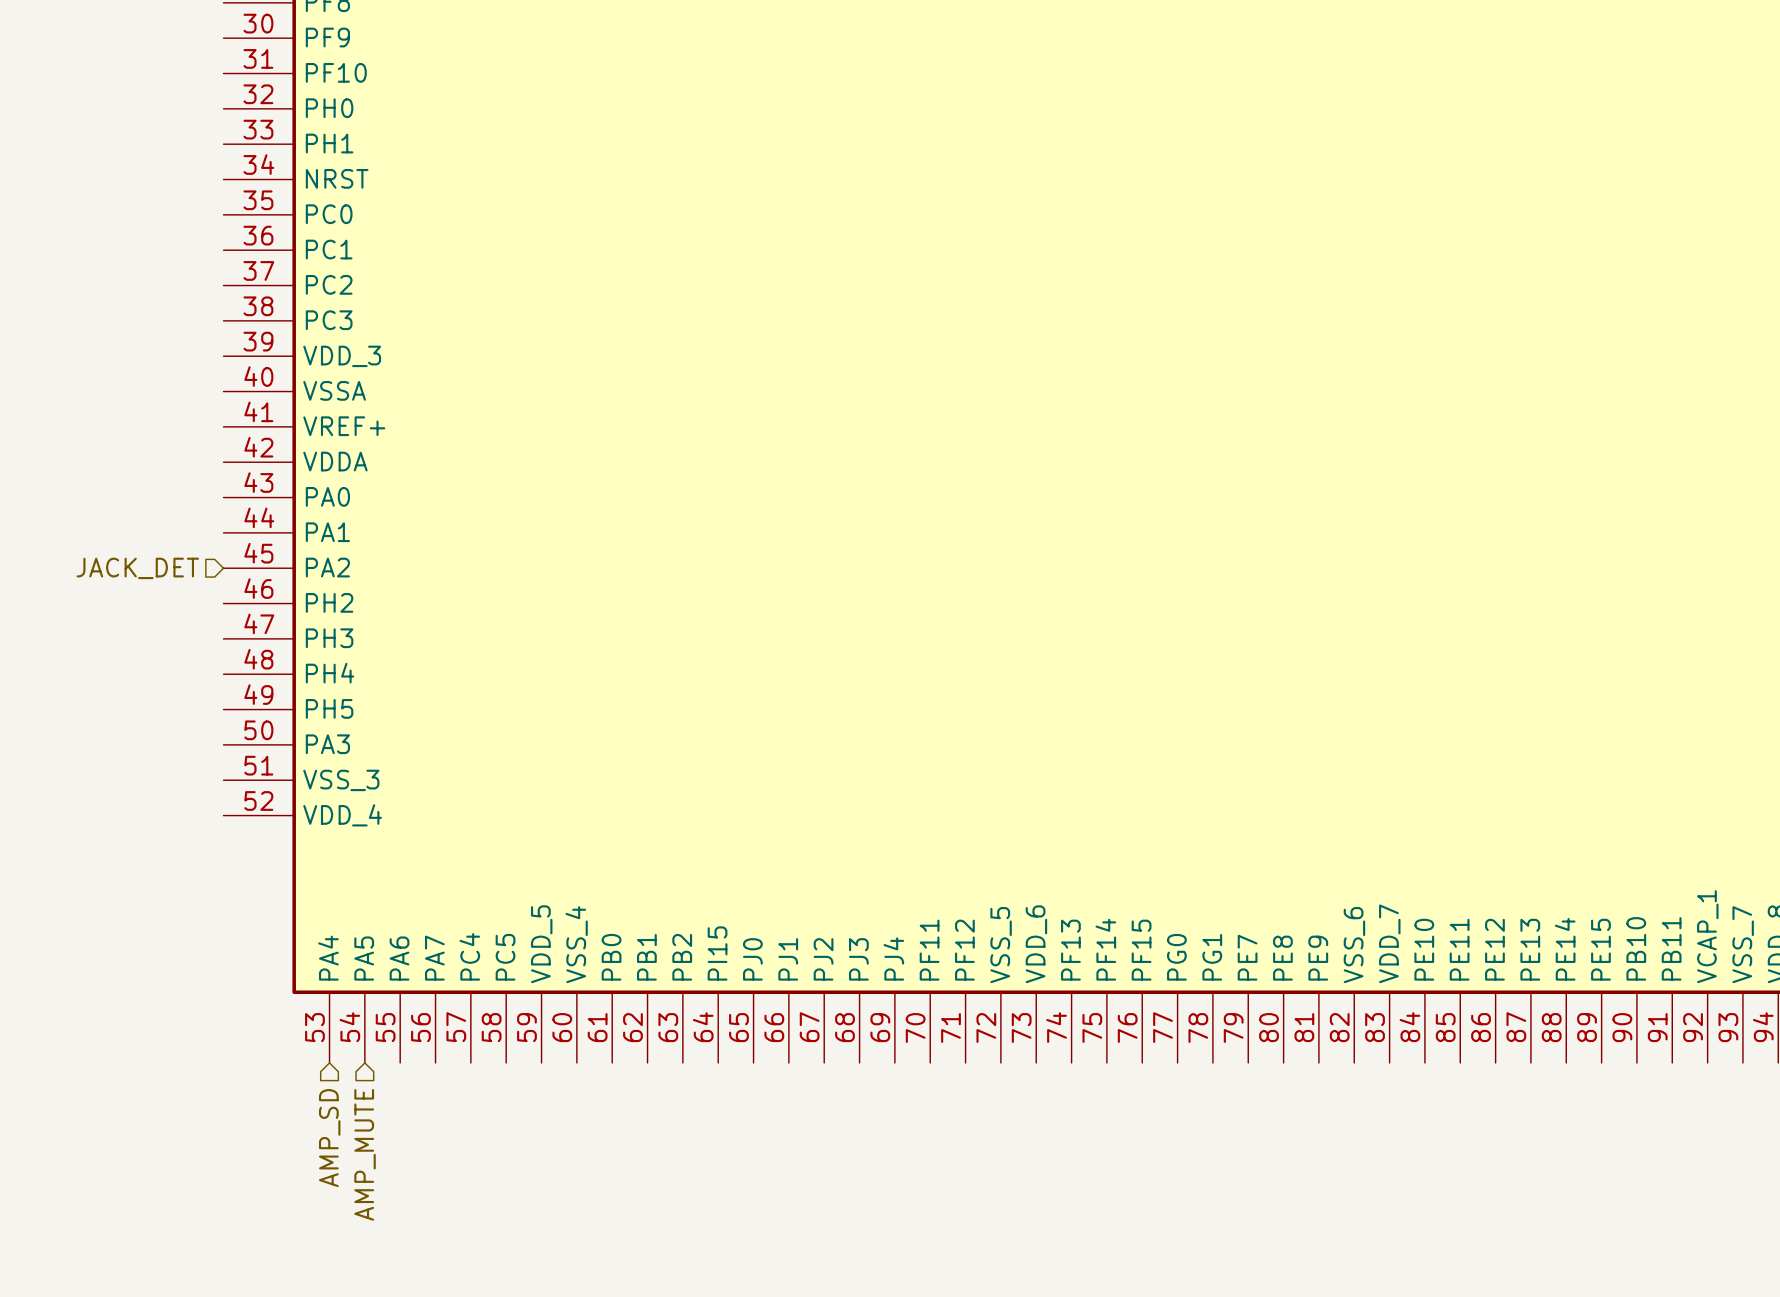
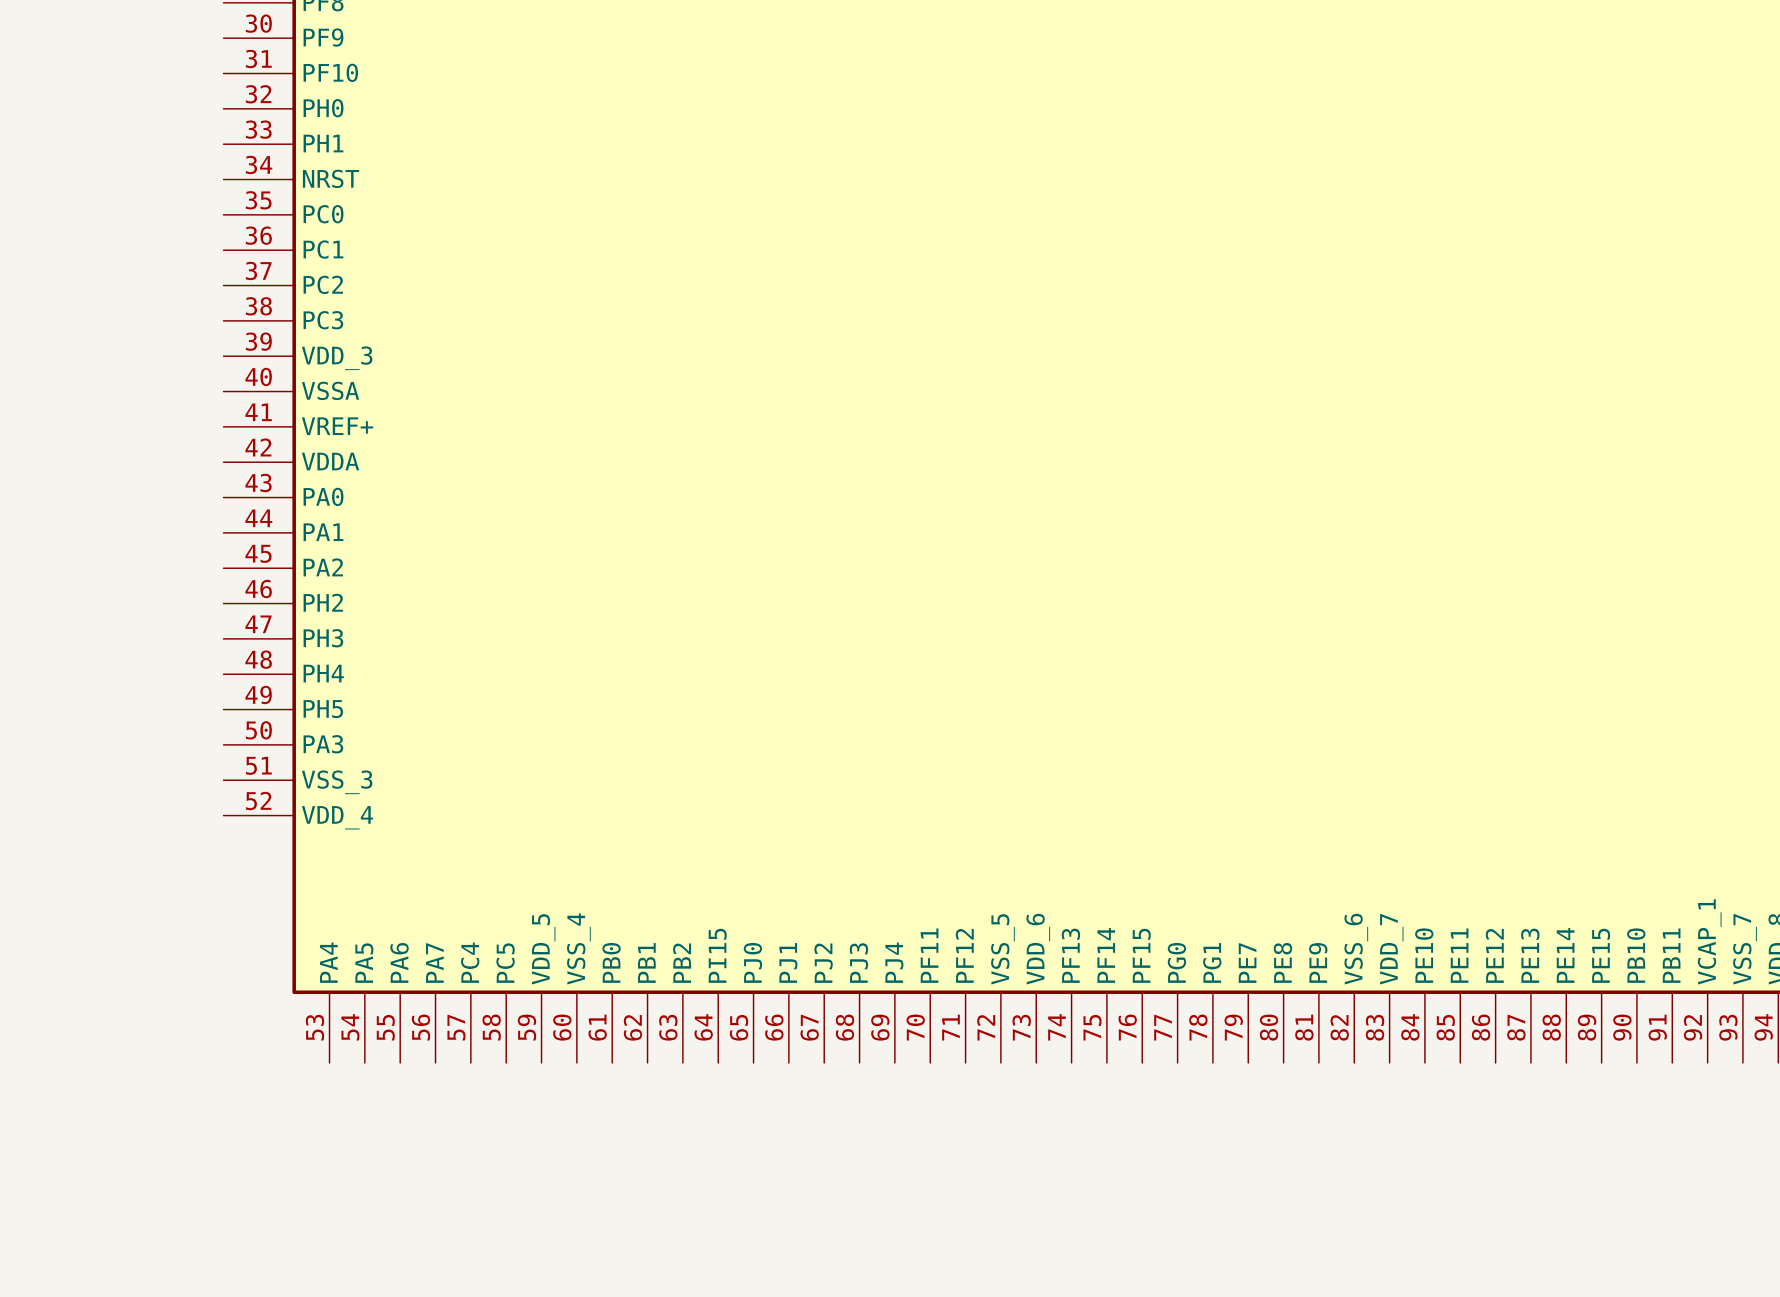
hierarchical label: JACK_DET (137, 568) -> none
hierarchical label: AMP_SD (329, 1138) -> none
hierarchical label: AMP_MUTE (365, 1154) -> none

